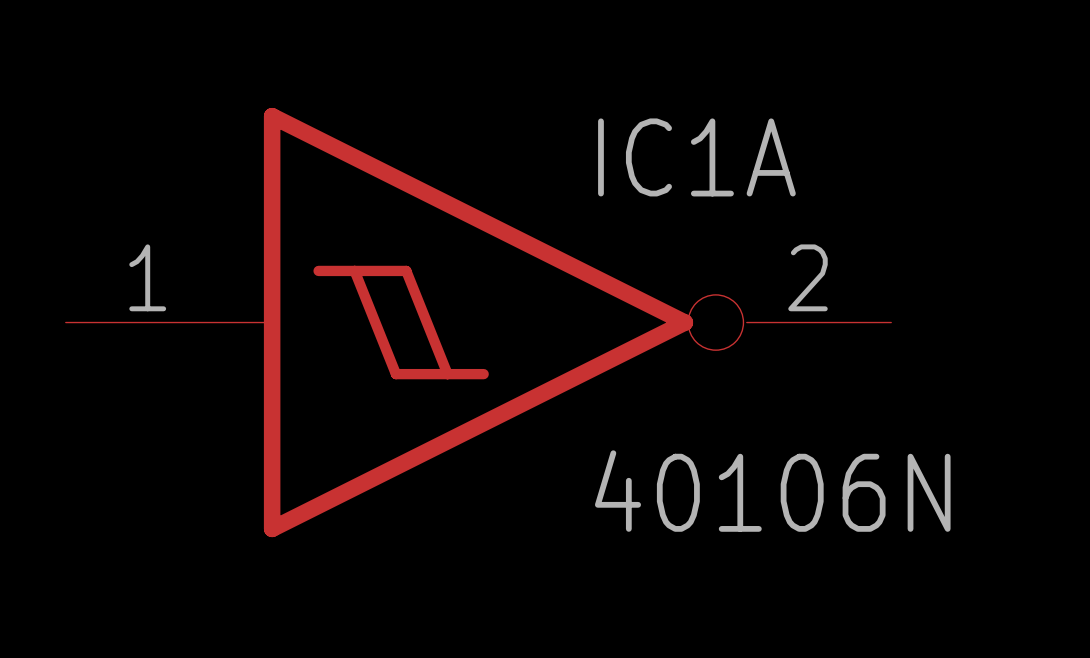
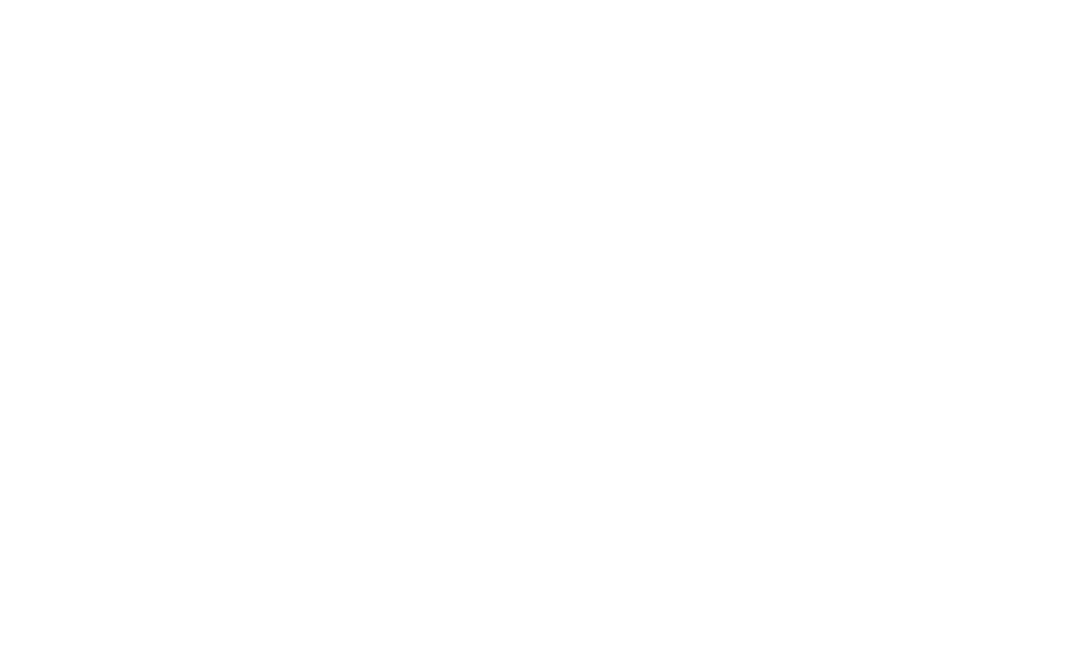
IC1A: 40106N (478, 322) -> none

